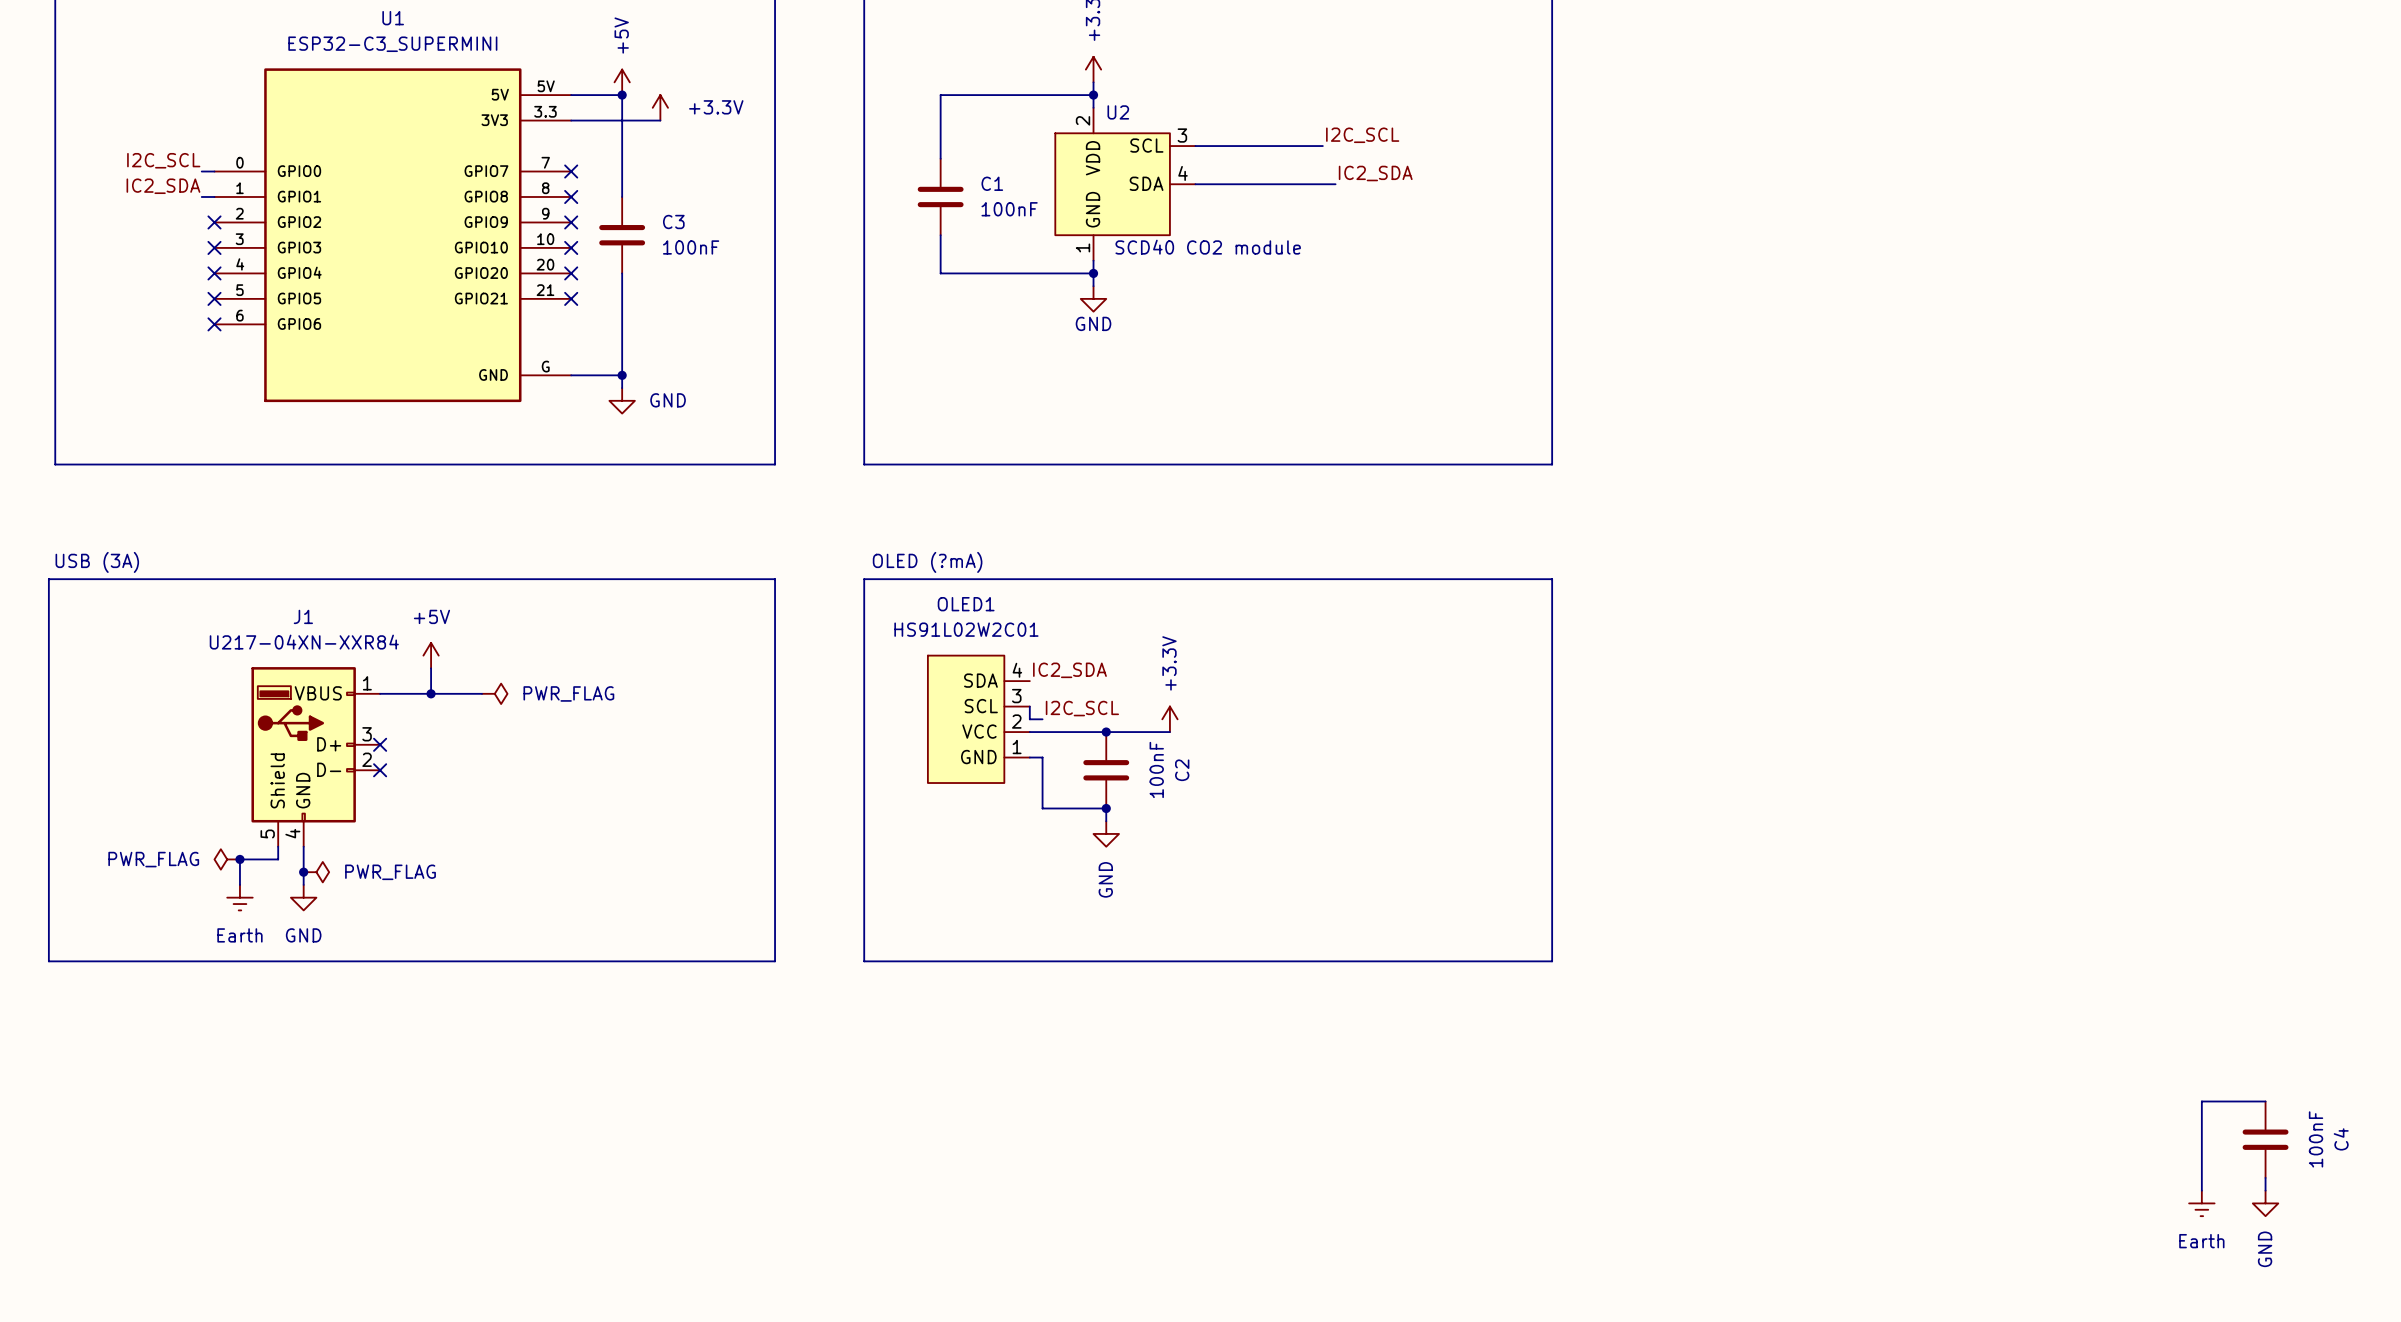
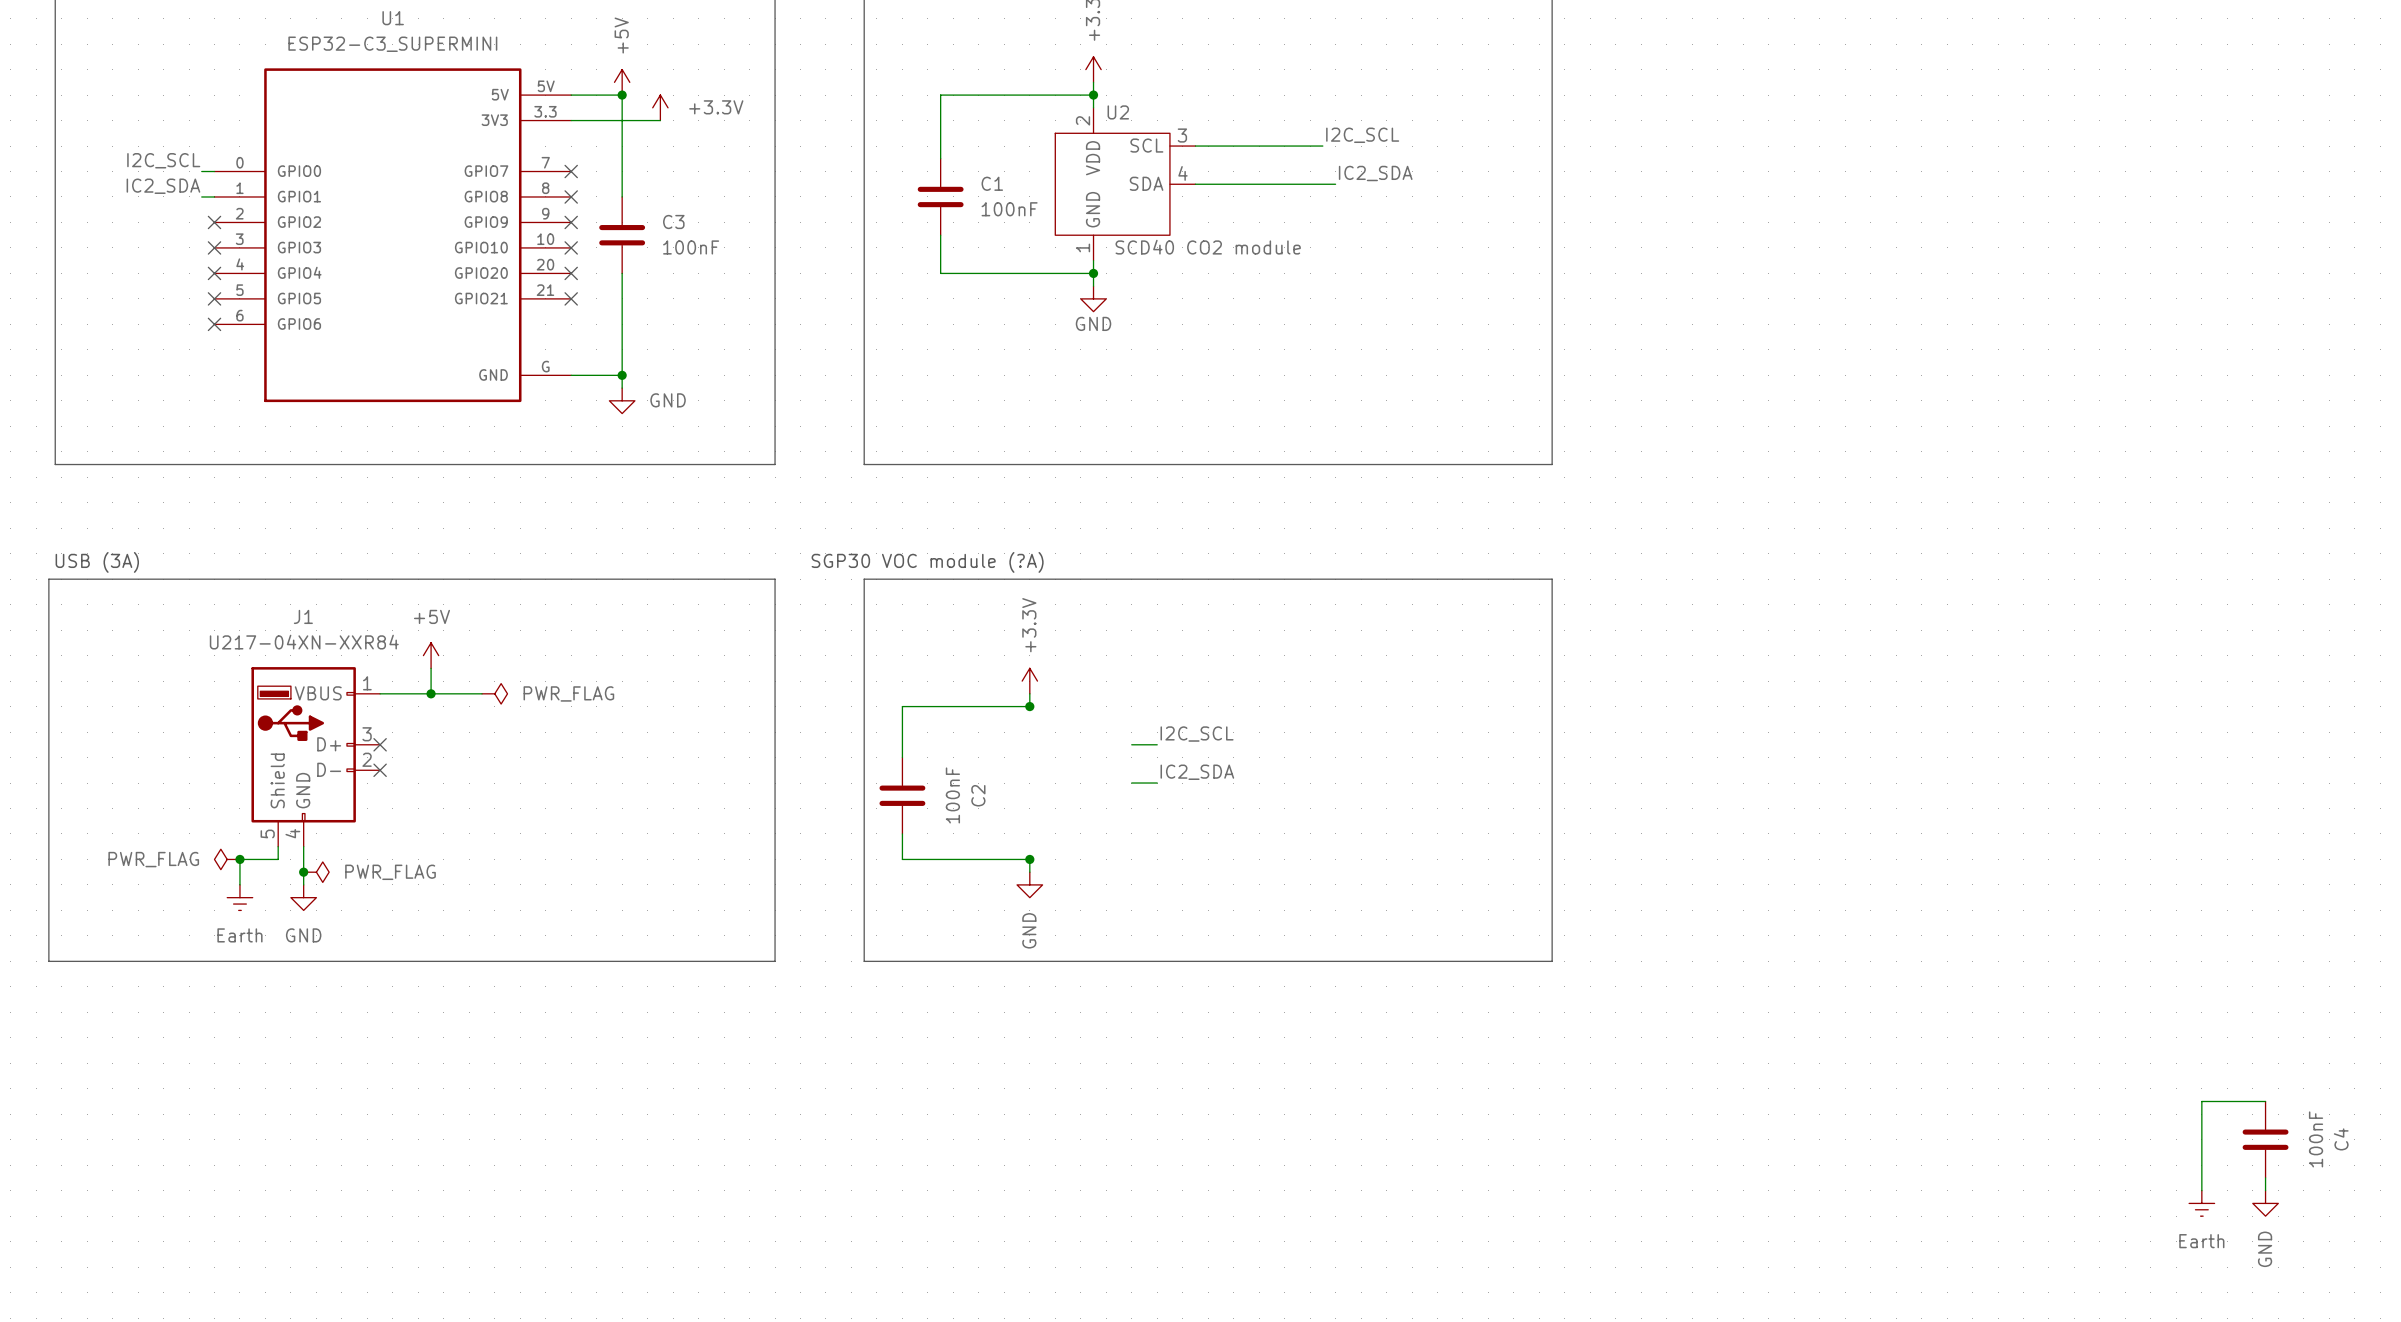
text: OLED (?mA) (927, 562) -> SGP30 VOC module (?A) (927, 562)
label position: IC2_SDA (1069, 670) -> IC2_SDA (1197, 772)
wire: none -> (1029, 693) (1029, 706) (902, 706) (902, 757)
wire: (1029, 706) (1029, 719) (1042, 719) -> none
junction: none -> (1029, 706)
label position: I2C_SCL (1082, 708) -> I2C_SCL (1197, 734)
OLED1: HS91L02W2C01 (978, 719) -> none
power symbol position: +3.3V (1169, 719) -> +3.3V (1029, 681)
wire: (1029, 732) (1169, 732) -> none
junction: (1106, 732) -> none
wire: none -> (1131, 744) (1157, 744)
wire: (1029, 757) (1042, 757) (1042, 808) (1106, 808) (1106, 821) -> none
C2 position: (1106, 770) -> (902, 795)
wire: none -> (1131, 783) (1157, 783)
junction: (1106, 808) -> none
wire: none -> (902, 833) (902, 859) (1029, 859) (1029, 872)
power symbol position: GND (1106, 833) -> GND (1029, 884)
junction: none -> (1029, 859)

